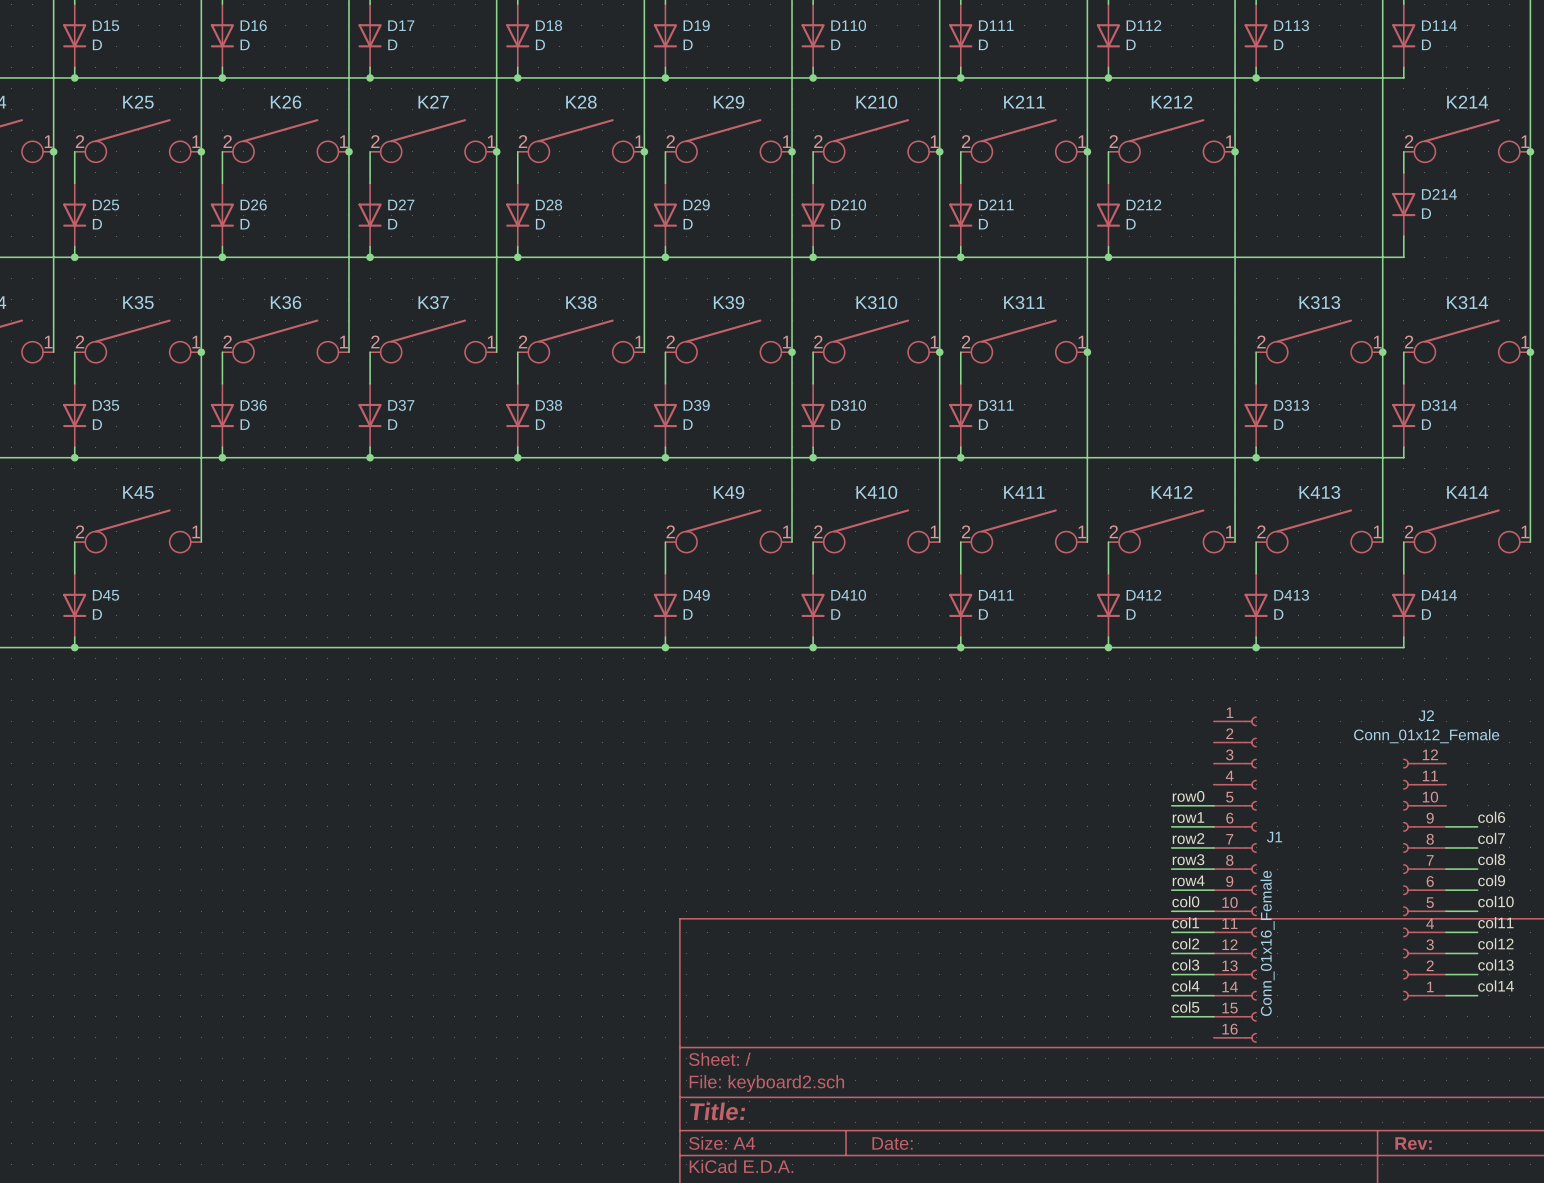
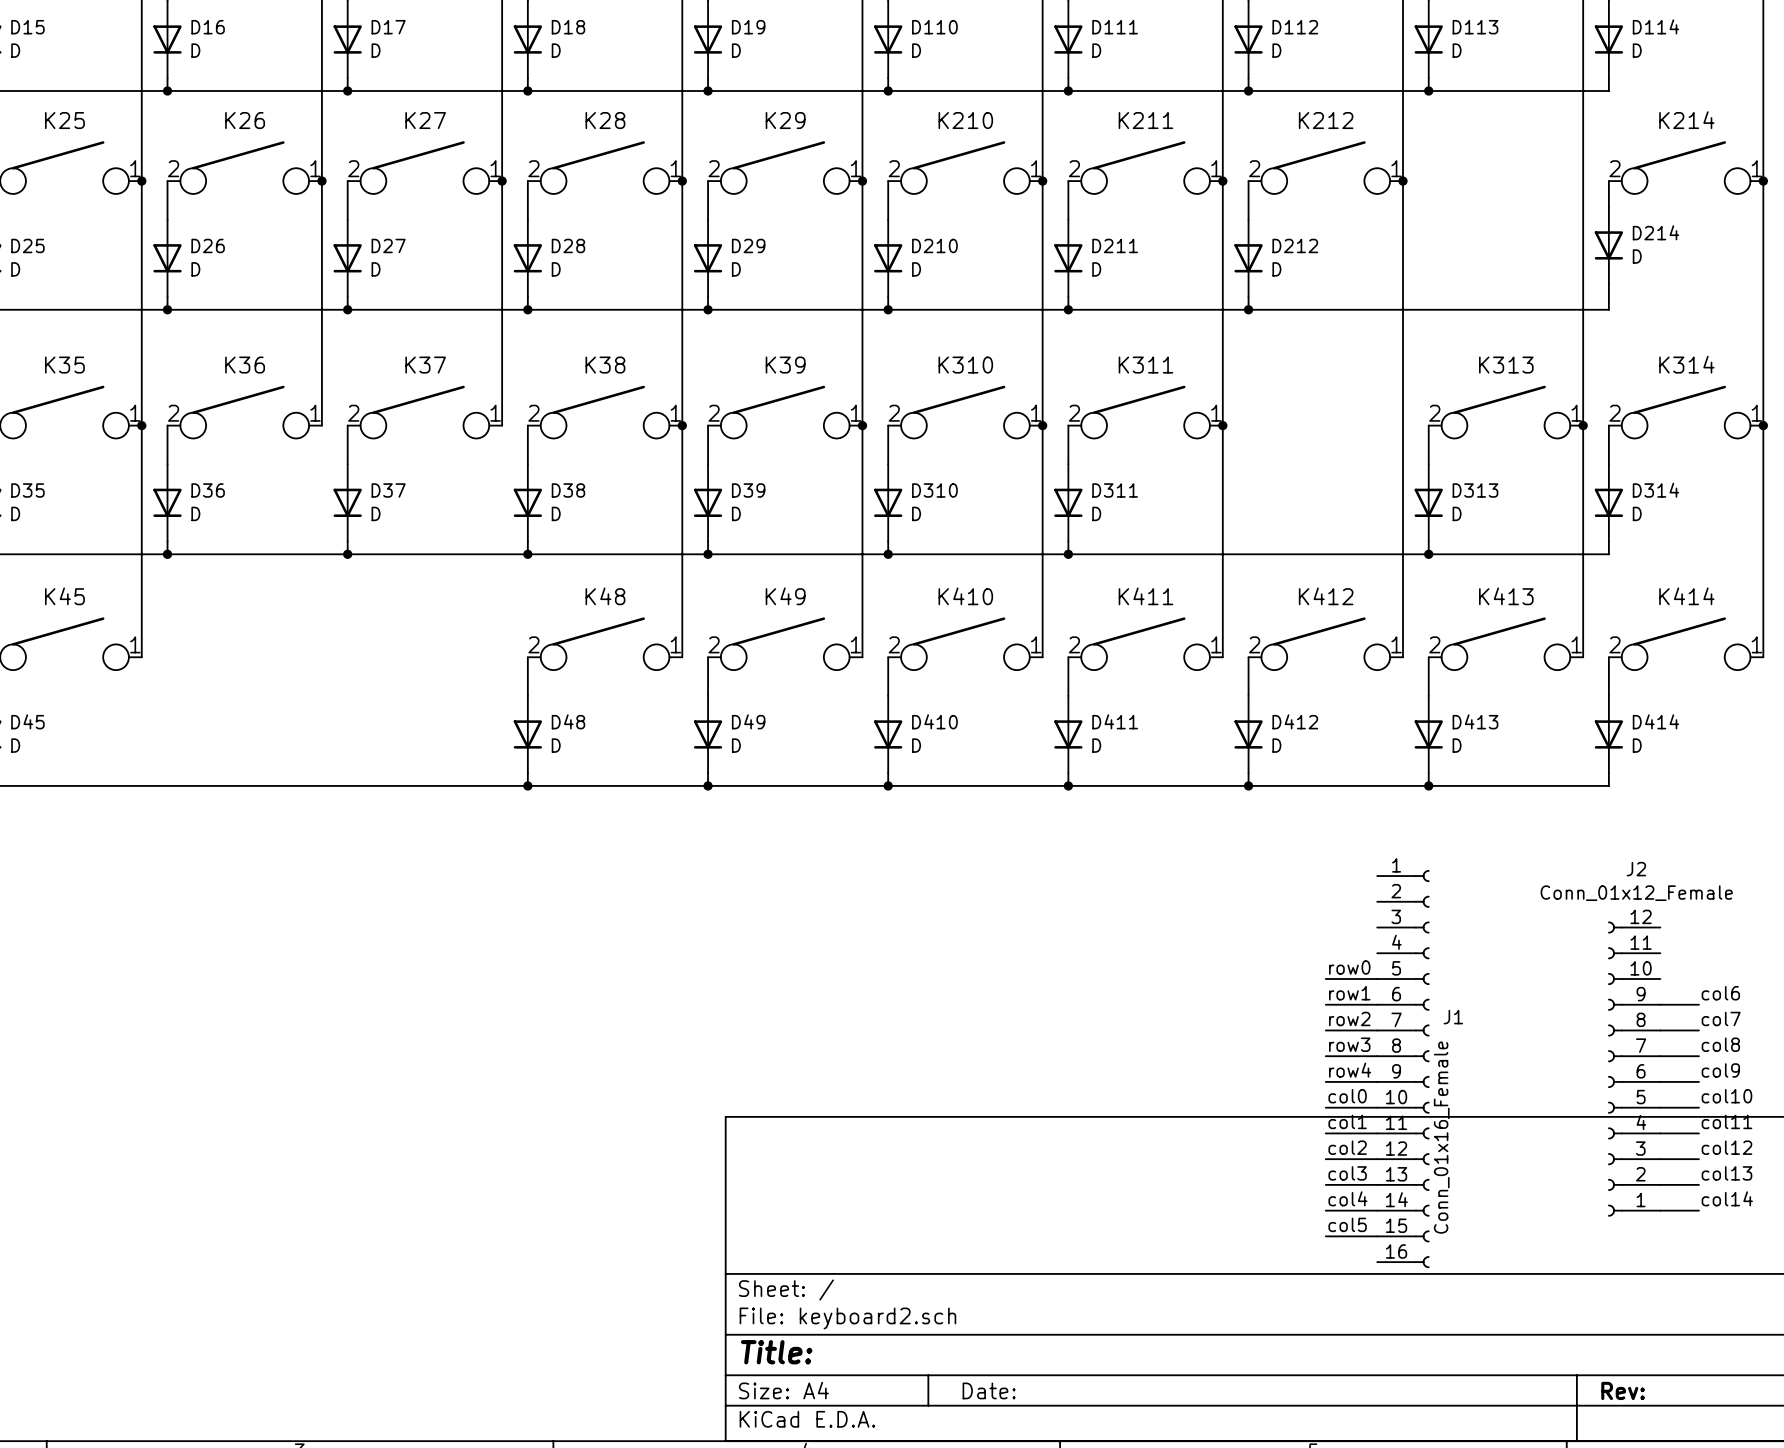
wire: none -> (682, 425) (682, 657)
junction: none -> (682, 425)
K48: none -> (605, 643)
wire: none -> (527, 657) (527, 695)
D48: none -> D (527, 734)
wire: none -> (527, 773) (527, 785)
junction: none -> (527, 785)

